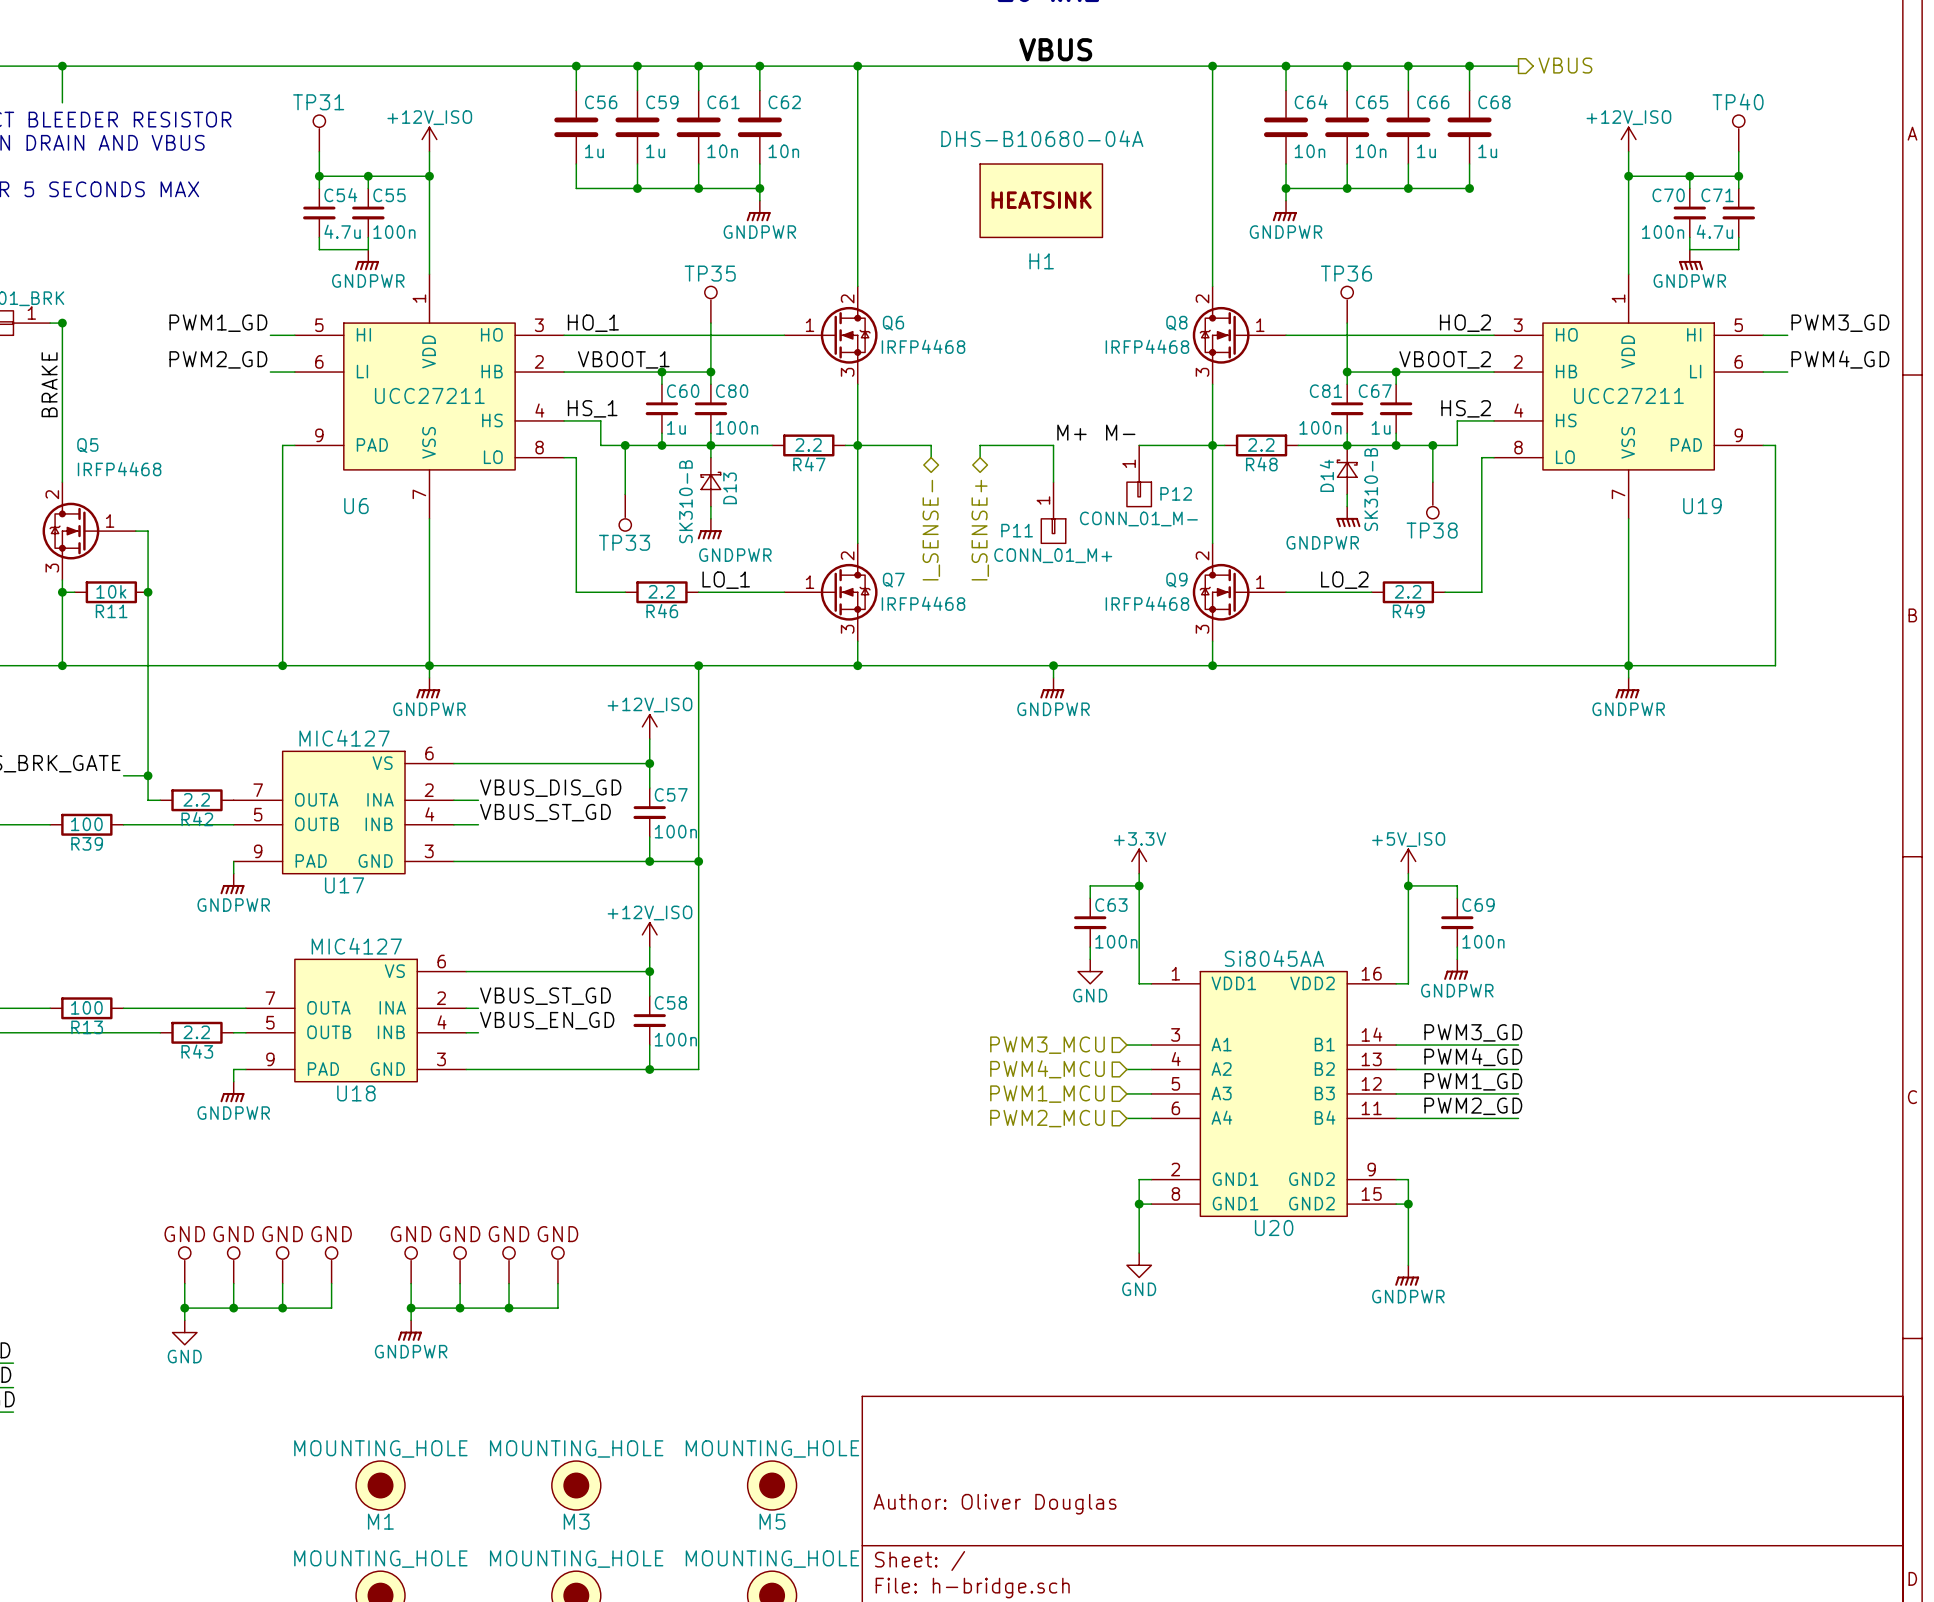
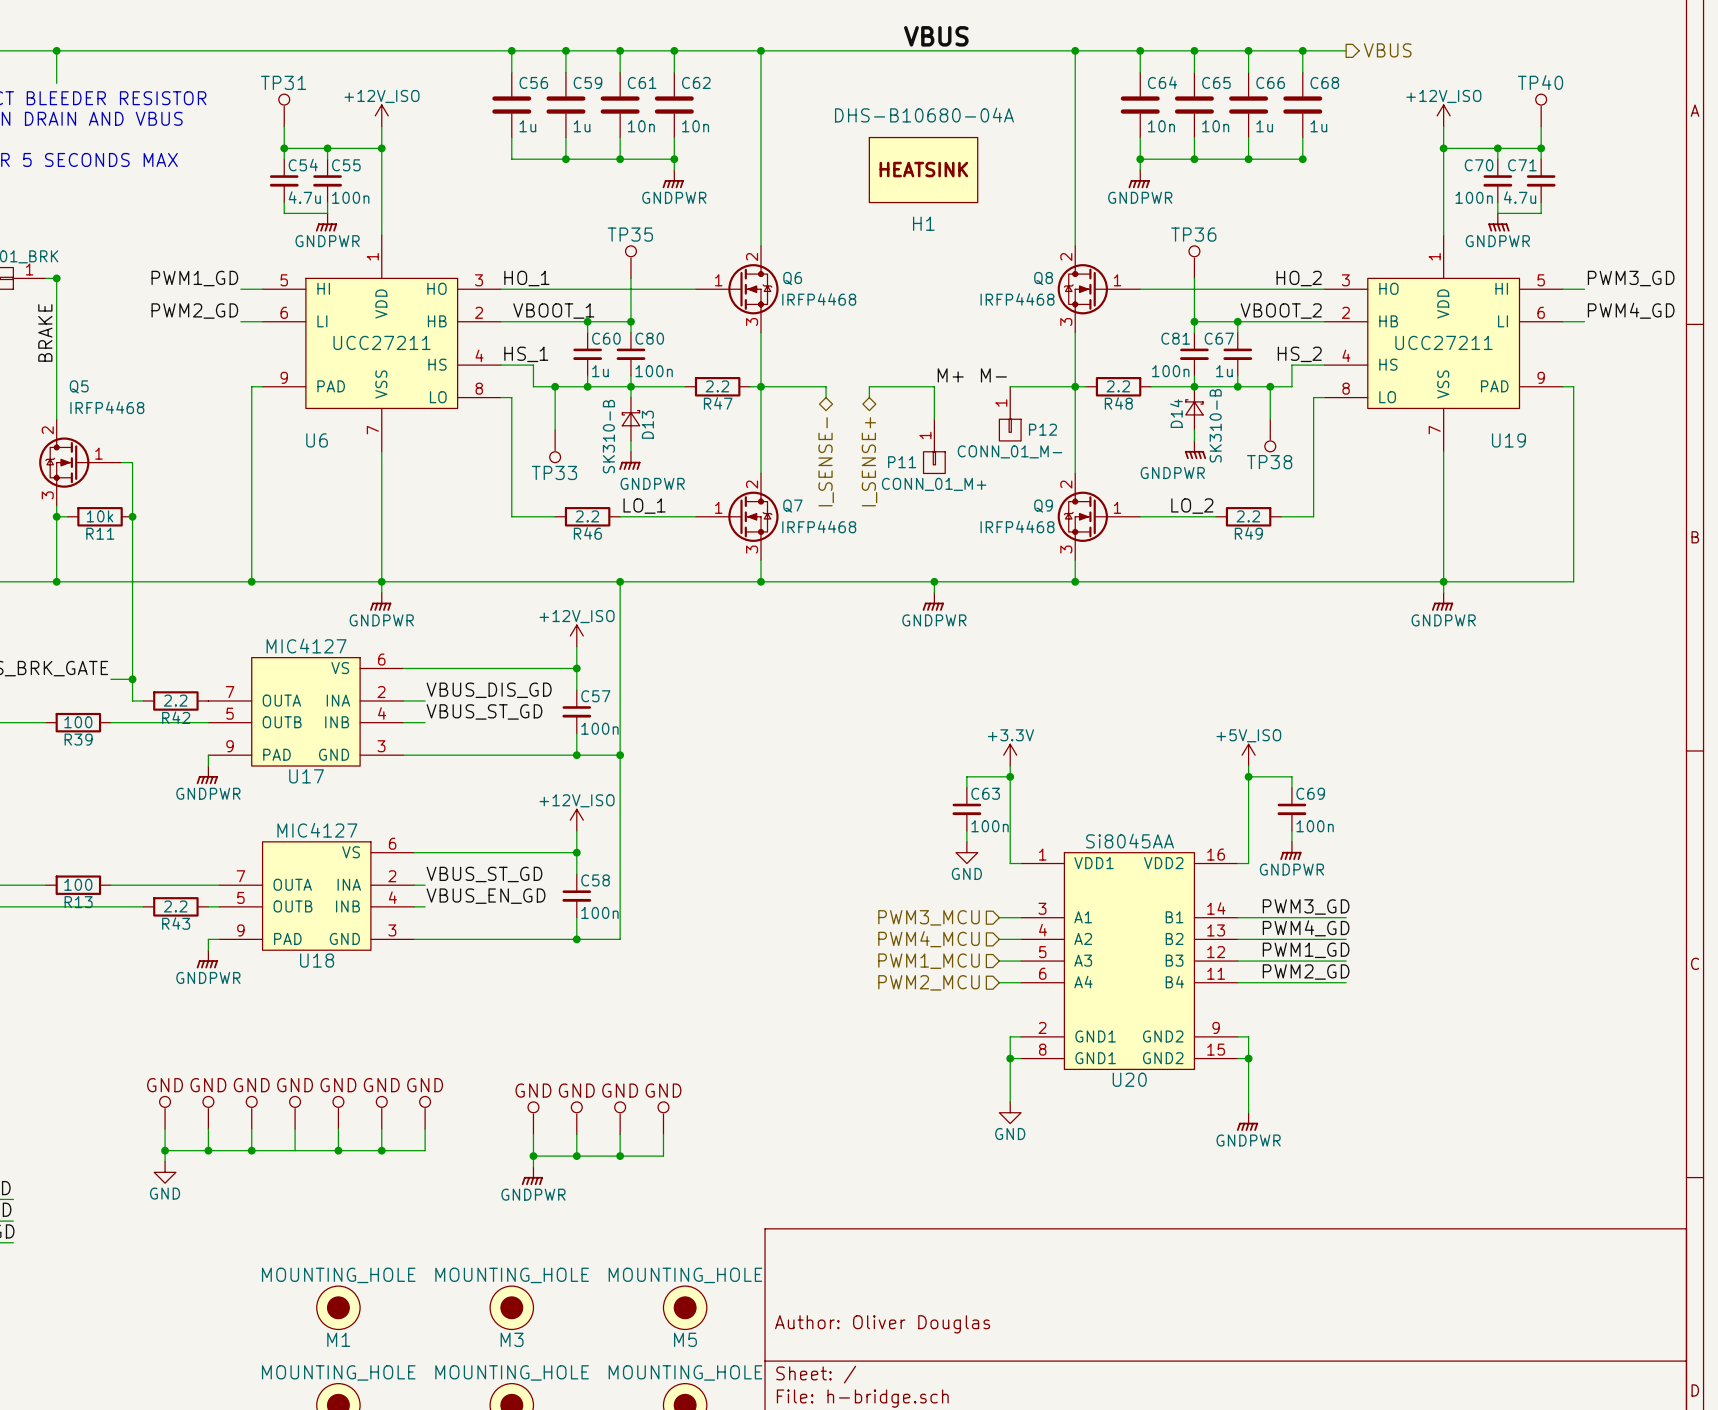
part: none -> (338, 1112)
part: (411, 1265) -> none
part: none -> (381, 1112)
part: (460, 1265) -> none
part: none -> (425, 1112)
part: (509, 1265) -> none
part: (557, 1265) -> none
part: none -> (533, 1118)
part: none -> (576, 1118)
part: none -> (620, 1118)
part: none -> (663, 1118)
wire: none -> (338, 1128) (338, 1150)
wire: (411, 1283) (411, 1320) -> (533, 1134) (533, 1166)
wire: none -> (381, 1128) (381, 1150)
wire: (460, 1283) (460, 1308) -> (576, 1134) (576, 1156)
wire: (509, 1283) (509, 1308) -> (620, 1134) (620, 1156)
wire: (557, 1283) (557, 1308) (478, 1308) -> (425, 1128) (425, 1150)
wire: none -> (663, 1134) (663, 1156) (533, 1156)
wire: none -> (295, 1150) (365, 1150)
junction: none -> (338, 1150)
junction: (411, 1308) -> none
junction: none -> (381, 1150)
junction: (460, 1308) -> none
junction: (509, 1308) -> none
junction: none -> (533, 1156)
junction: none -> (576, 1156)
junction: none -> (620, 1156)
power symbol position: GNDPWR (409, 1330) -> GNDPWR (532, 1176)

